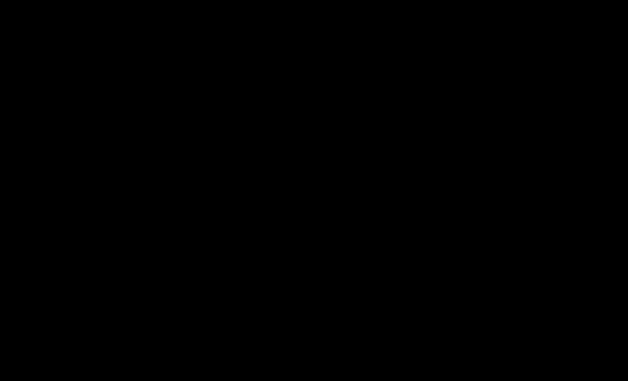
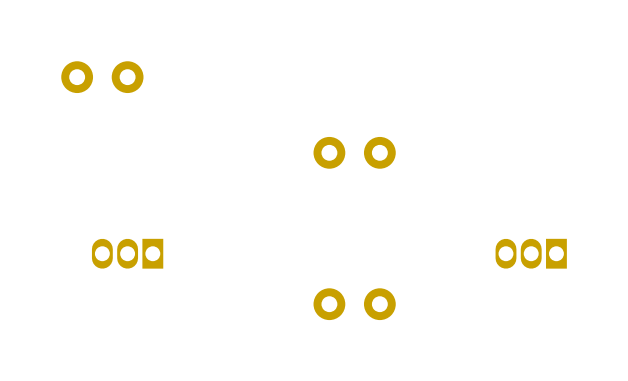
part: none -> (102, 77)
part: none -> (354, 152)
part: none -> (127, 253)
part: none -> (531, 253)
part: none -> (354, 304)

